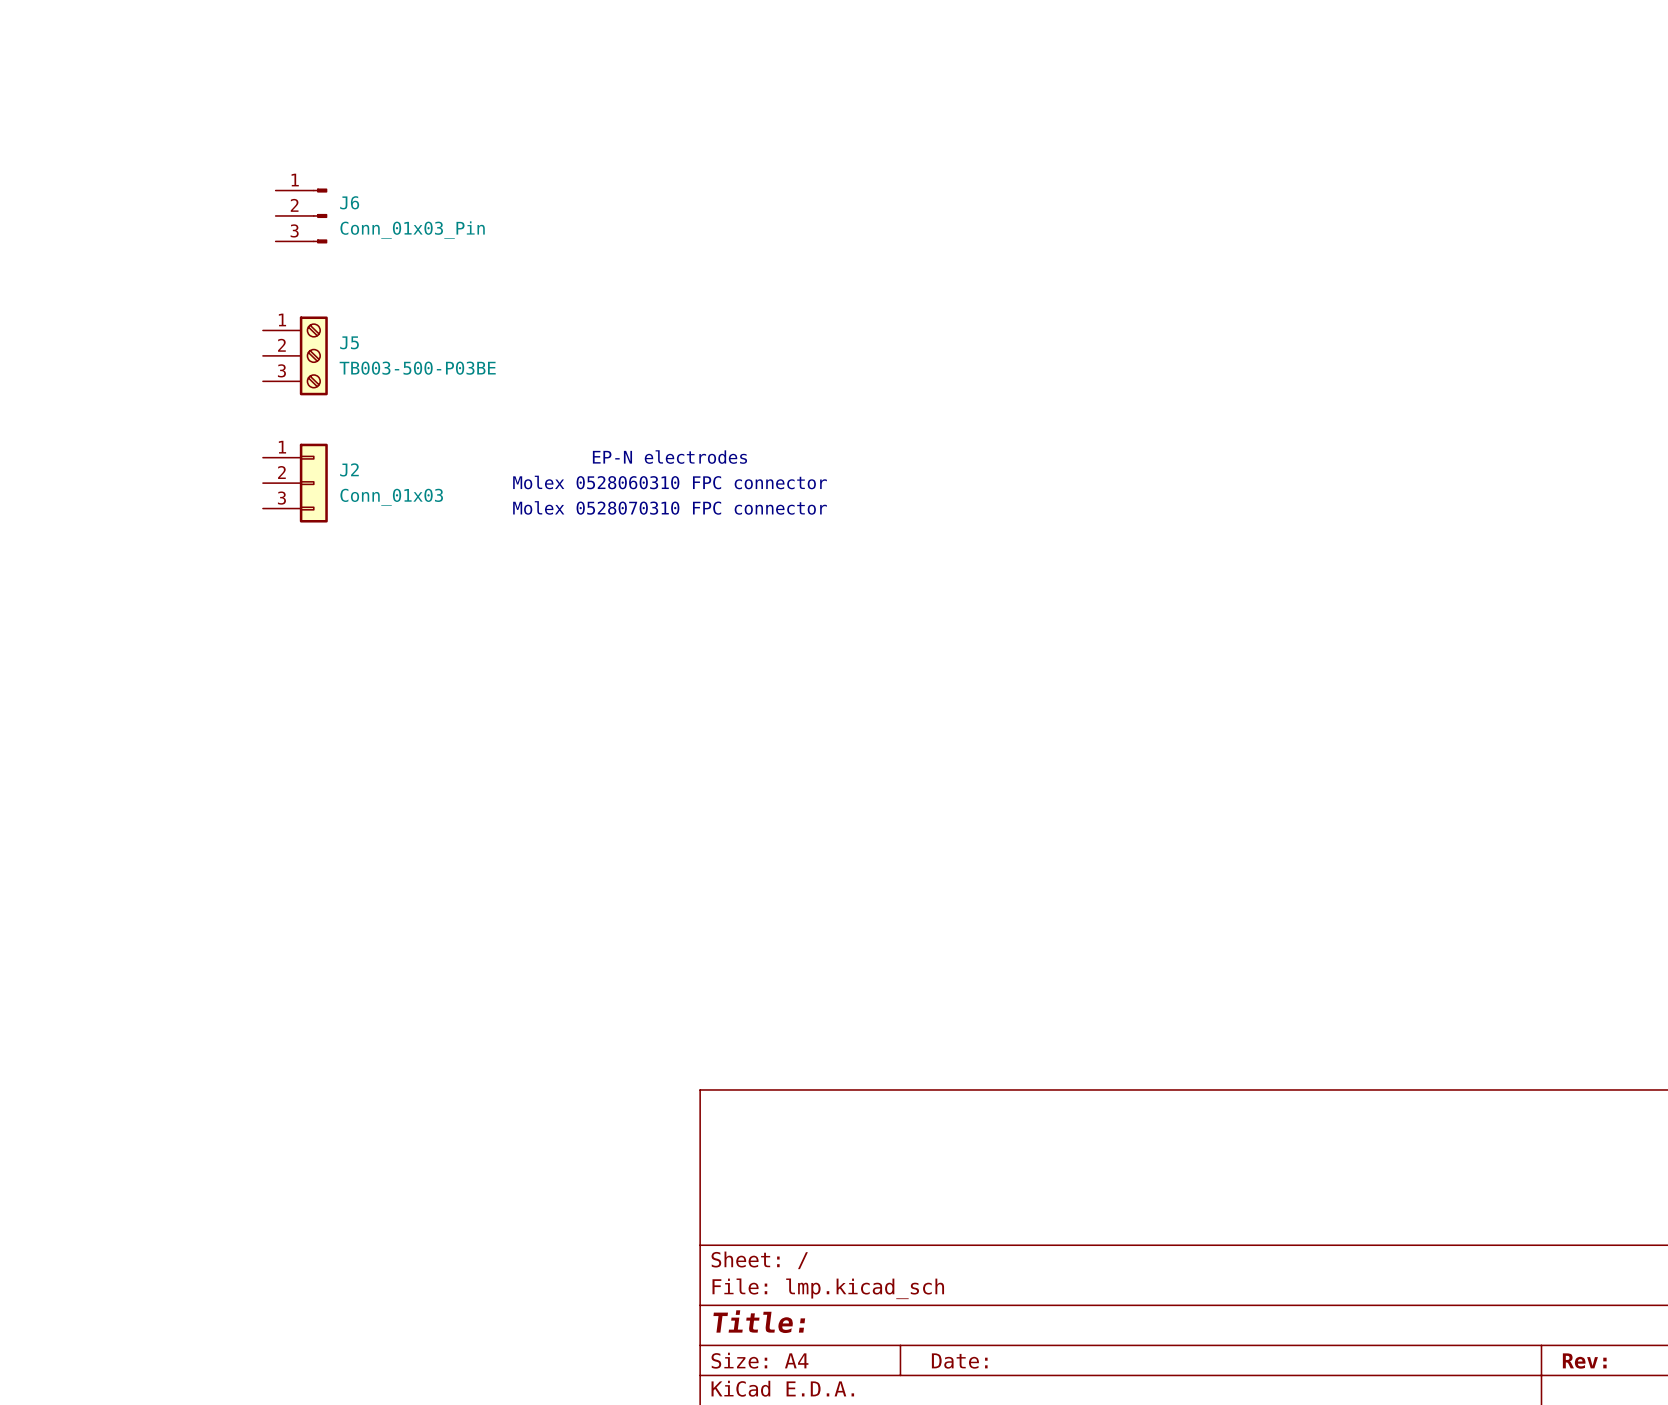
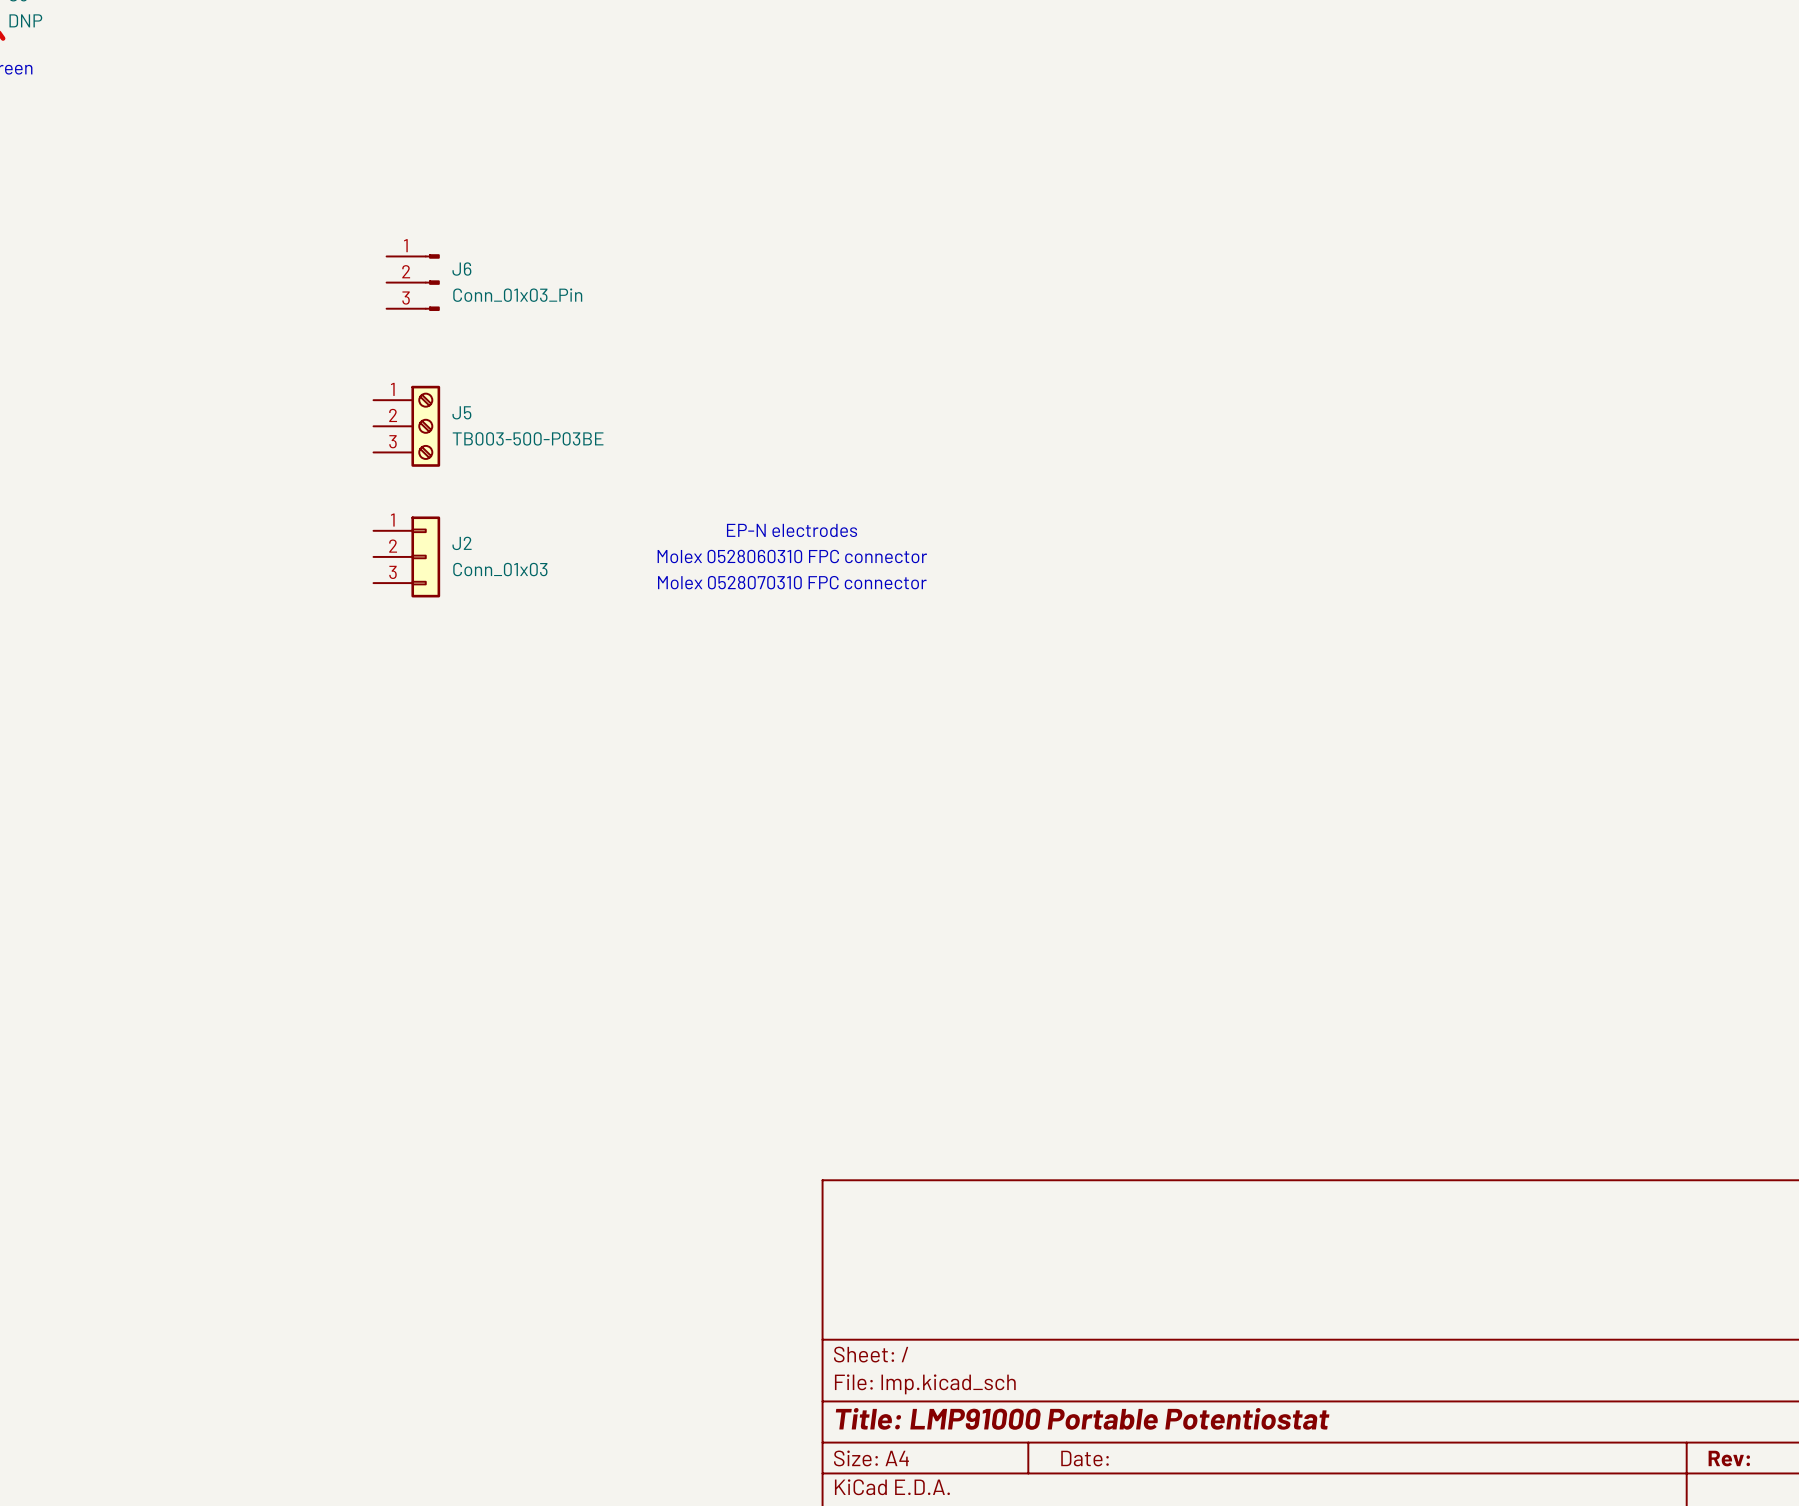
title block: Title: (759, 1321) -> Title: LMP91000 Portable Potentiostat (1082, 1418)

